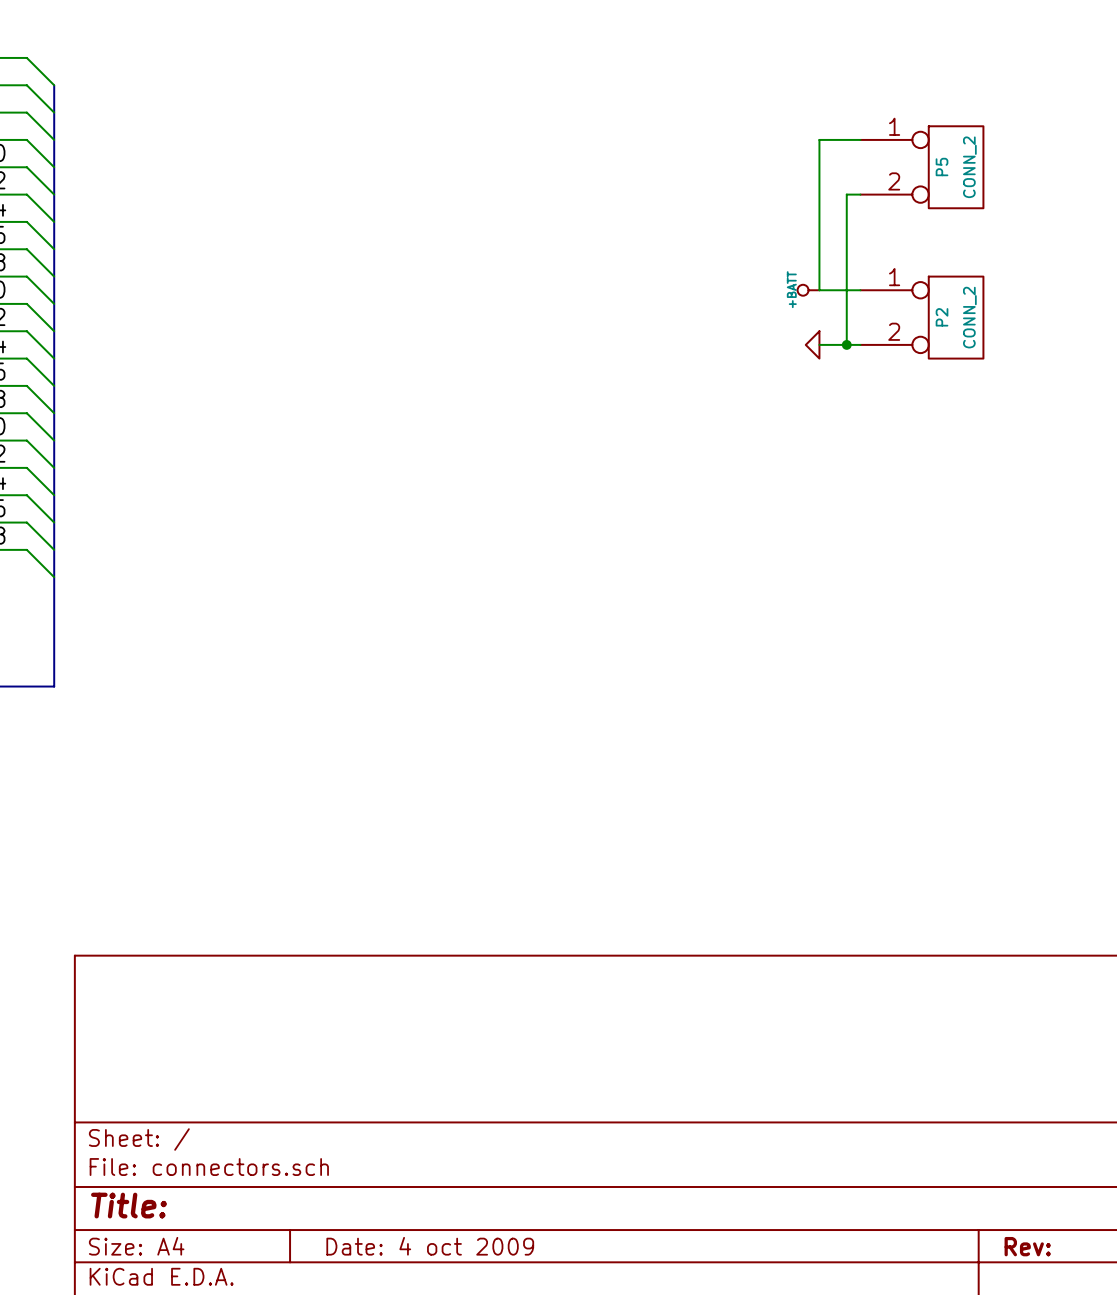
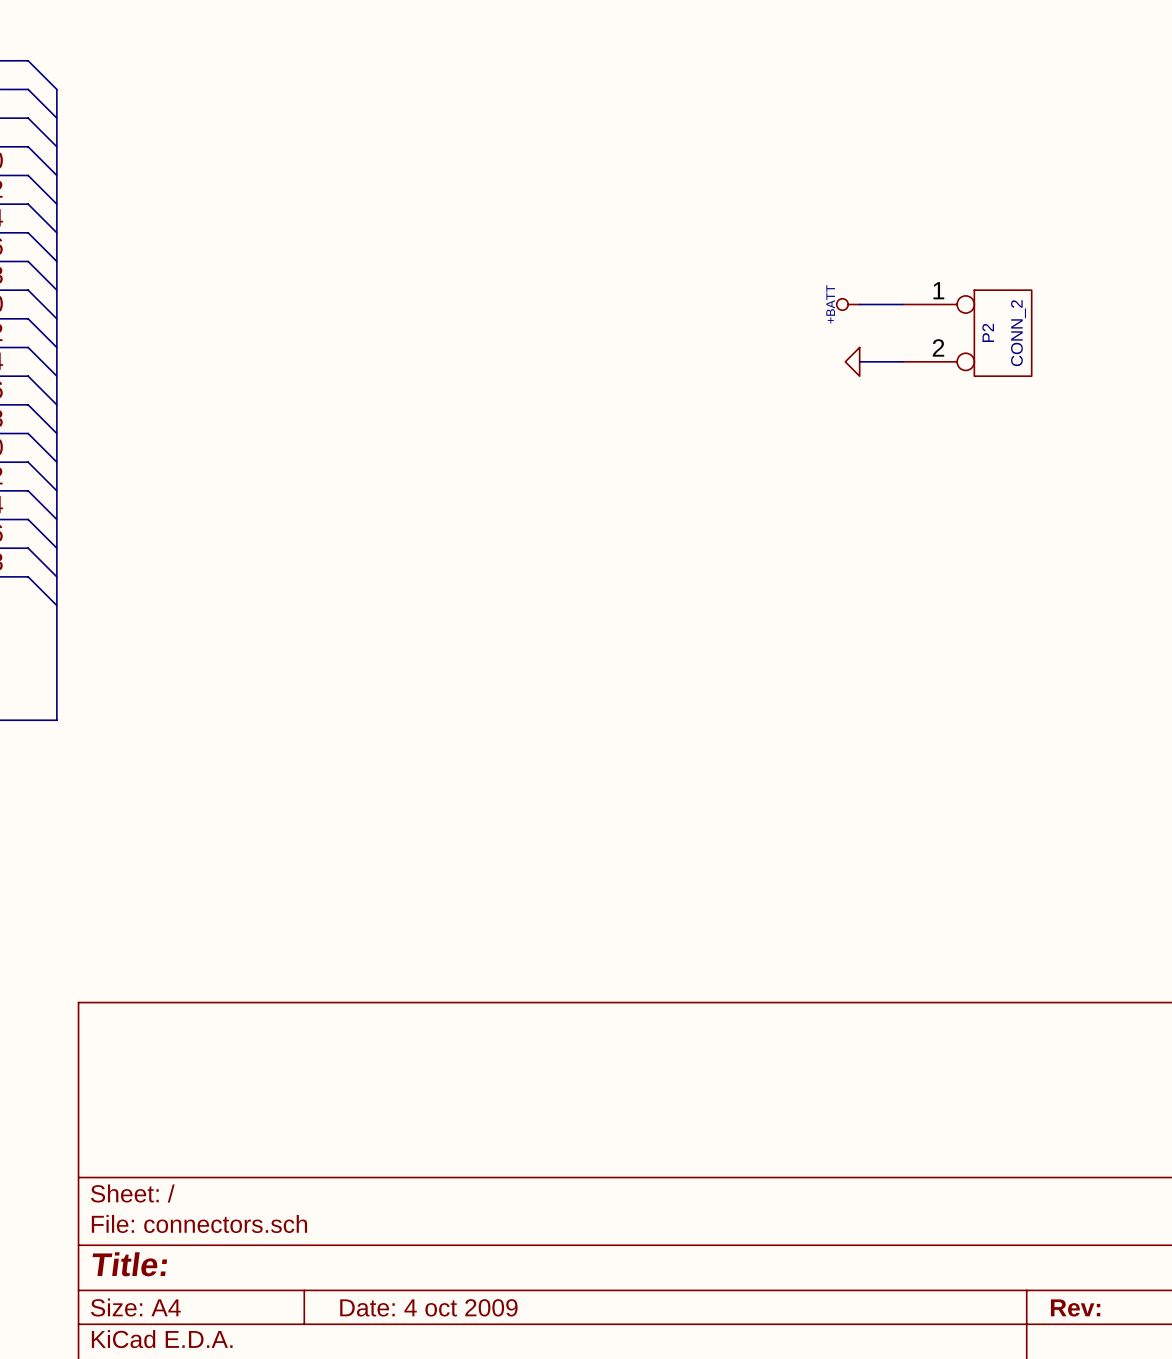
wire: (860, 139) (819, 139) (819, 290) -> none
P5: CONN_2 (921, 167) -> none
wire: (860, 194) (846, 194) (846, 344) -> none
junction: (846, 344) -> none

